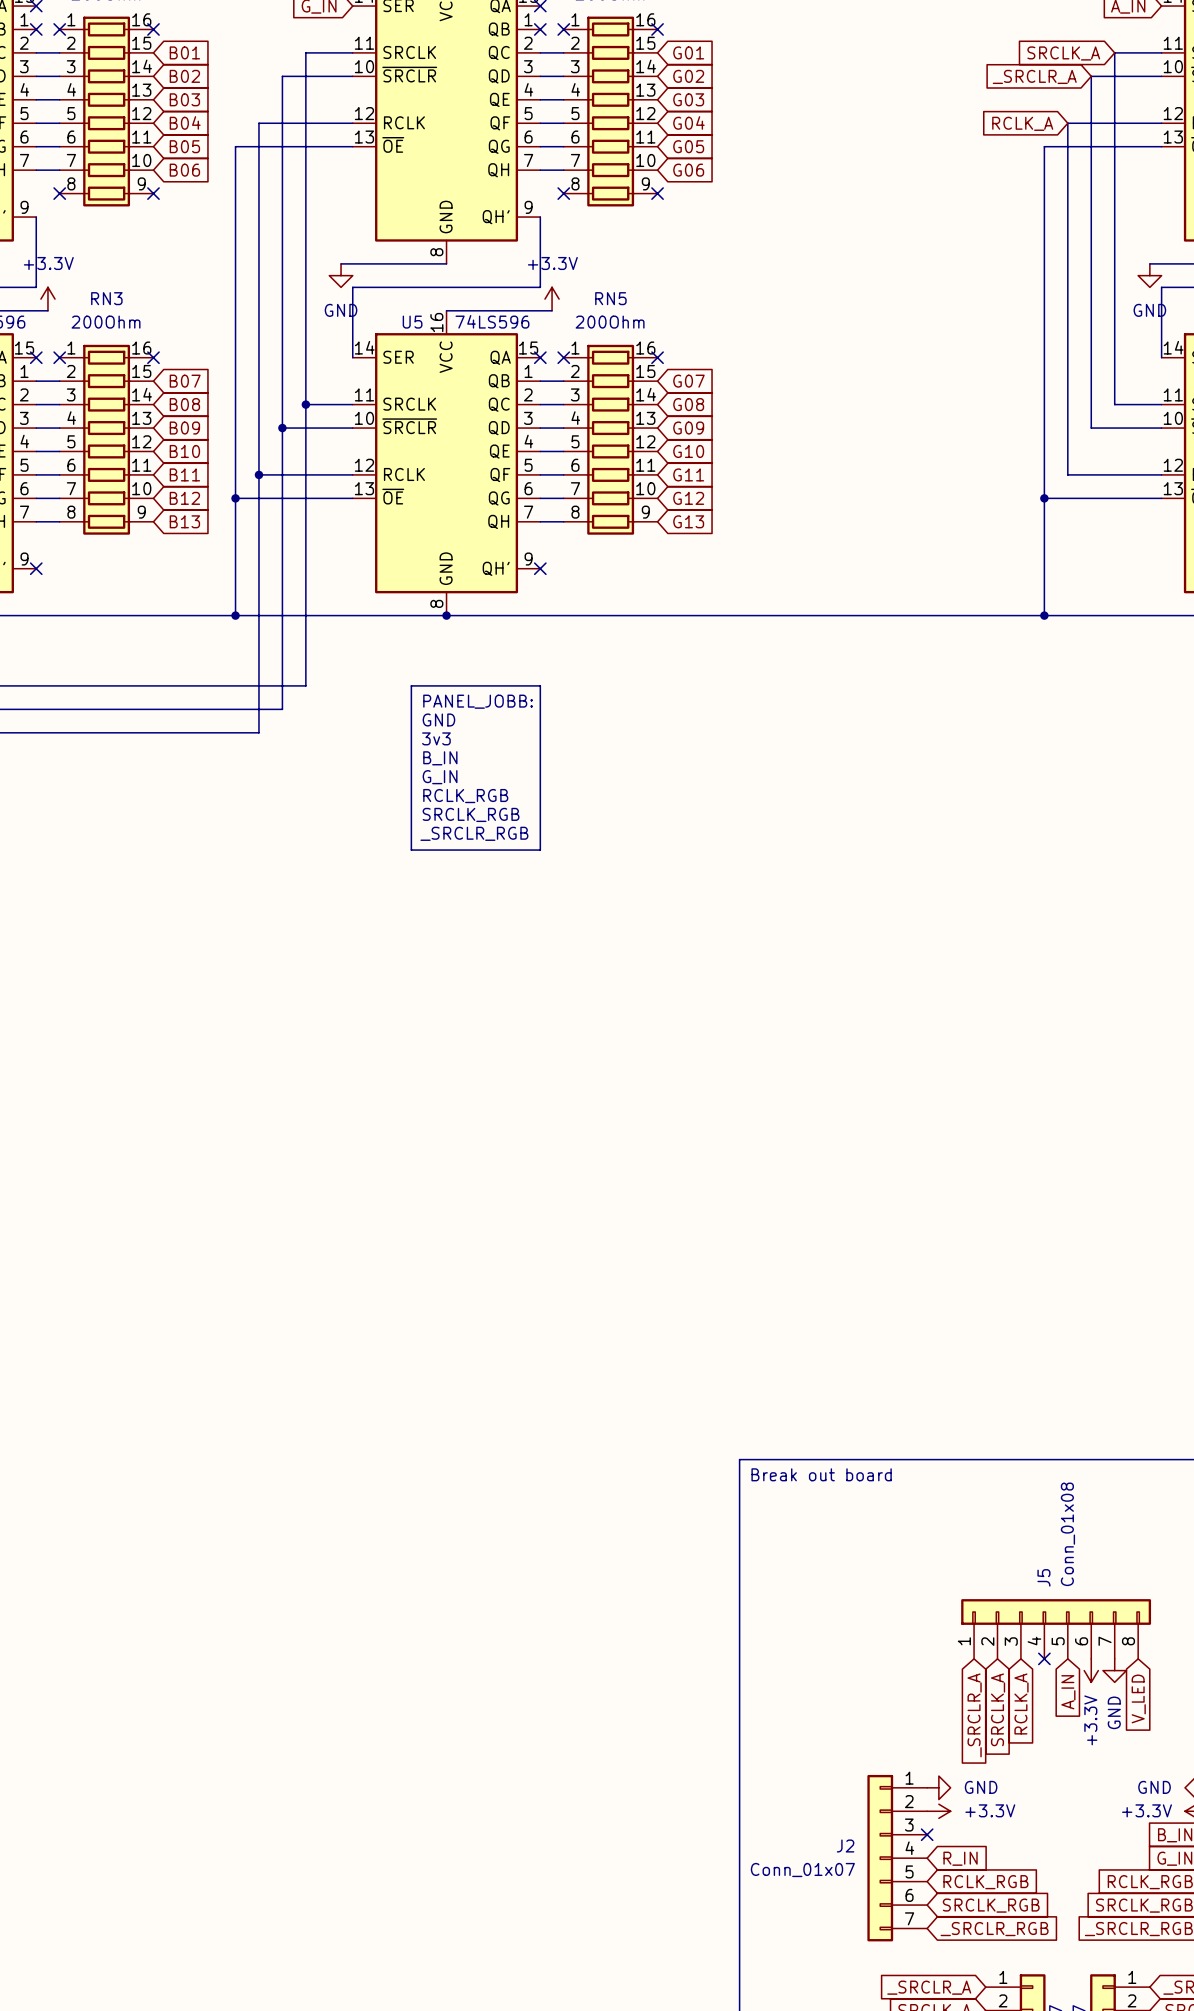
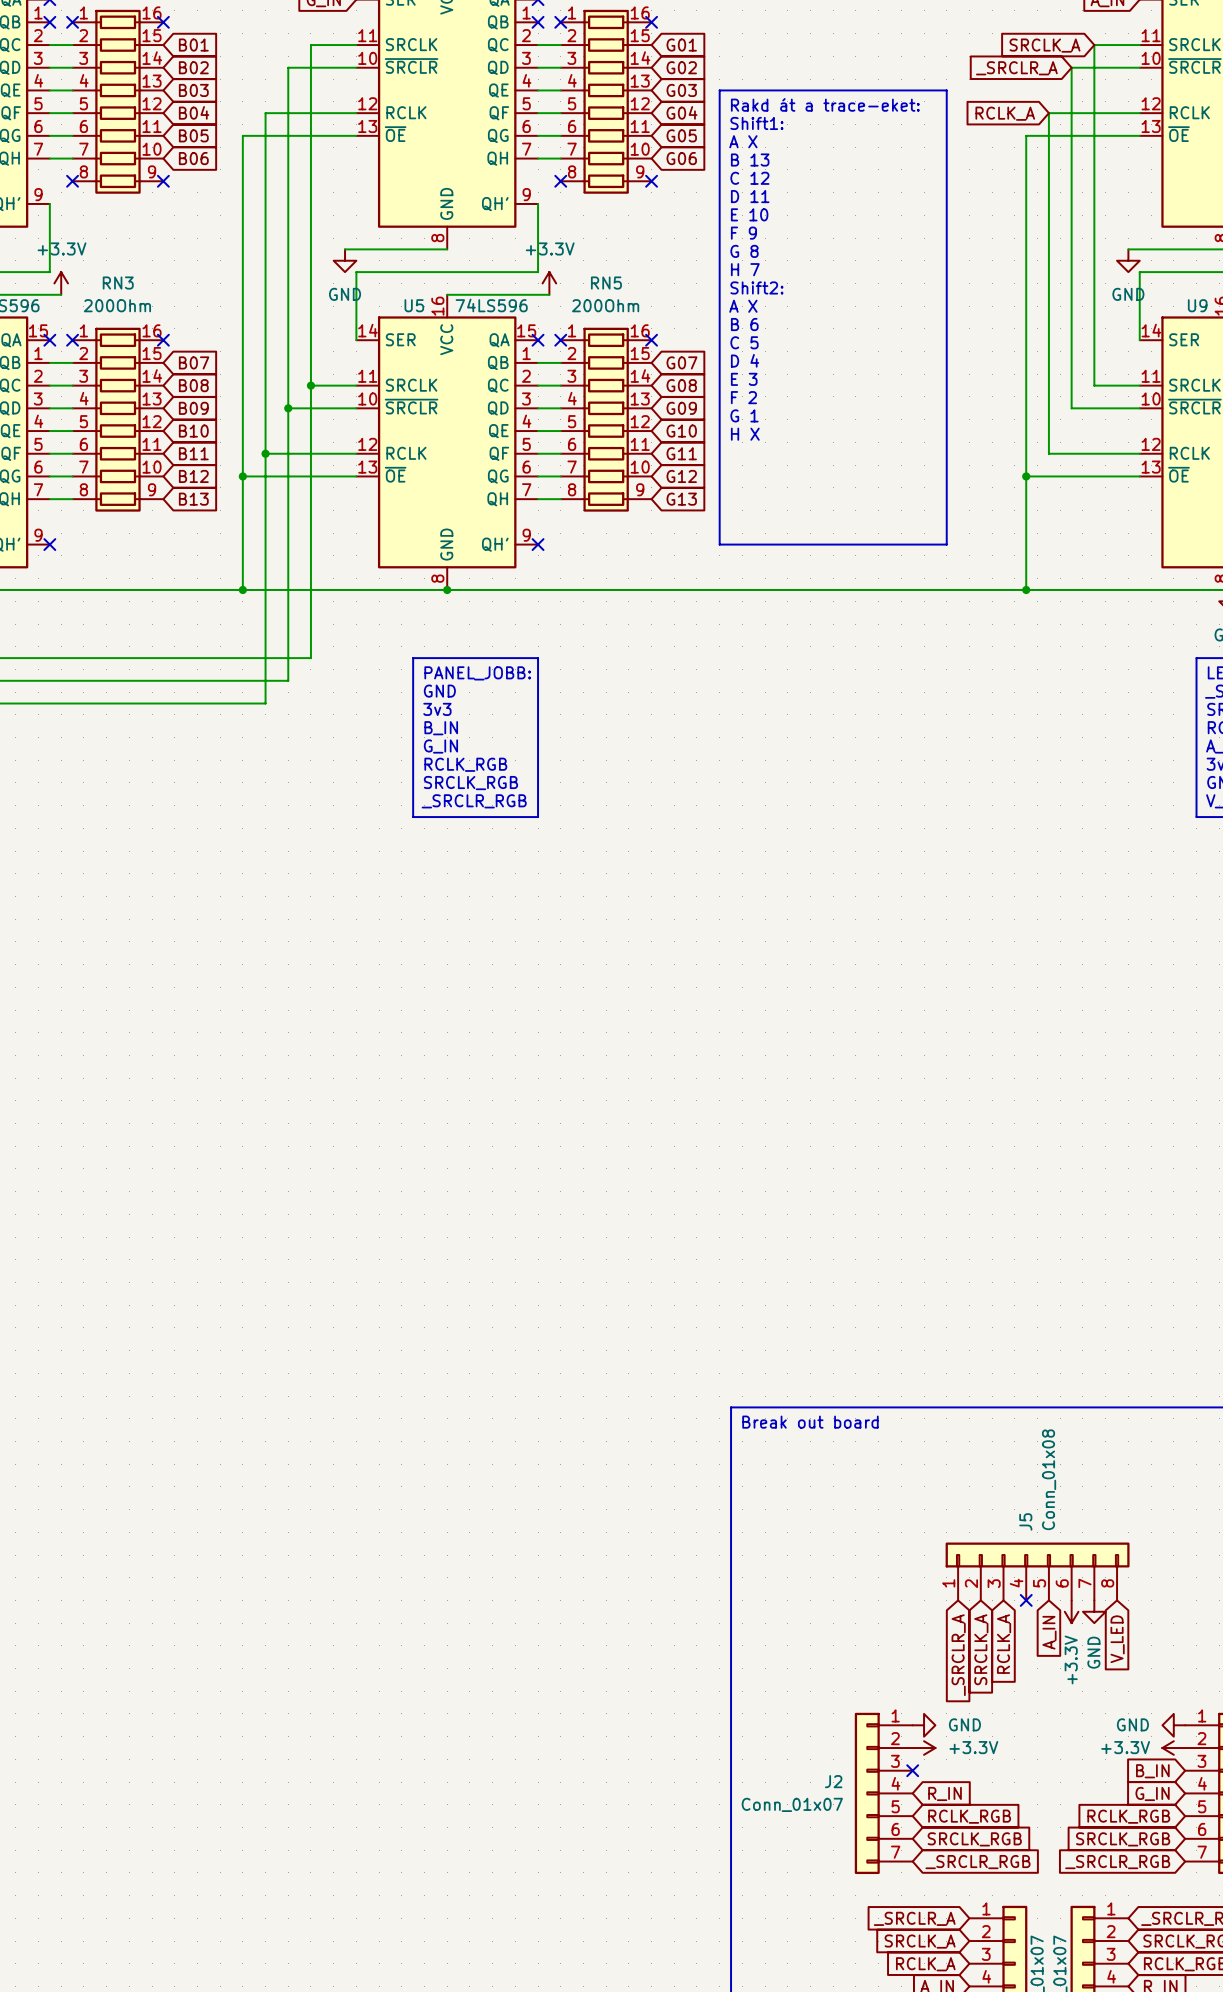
line: none -> (719, 90) (946, 90) (946, 544) (719, 544) (719, 90)
text: none -> Rakd át a trace-eket: (825, 104)
text: none -> Shift1: (756, 123)
text: none -> A X (743, 141)
text: none -> B 13 (750, 160)
text: none -> C 12 (749, 178)
text: none -> D 11 (750, 196)
text: none -> E 10 (749, 214)
text: none -> F 9 (743, 233)
text: none -> G 8 (744, 251)
text: none -> H 7 (745, 269)
text: none -> Shift2: (756, 287)
text: none -> A X (743, 306)
text: none -> B 6 (744, 324)
text: none -> C 5 (744, 342)
text: none -> D 4 (745, 360)
text: none -> E 3 (744, 379)
text: none -> F 2 (743, 397)
text: none -> G 1 (744, 415)
text: none -> H X (745, 434)

